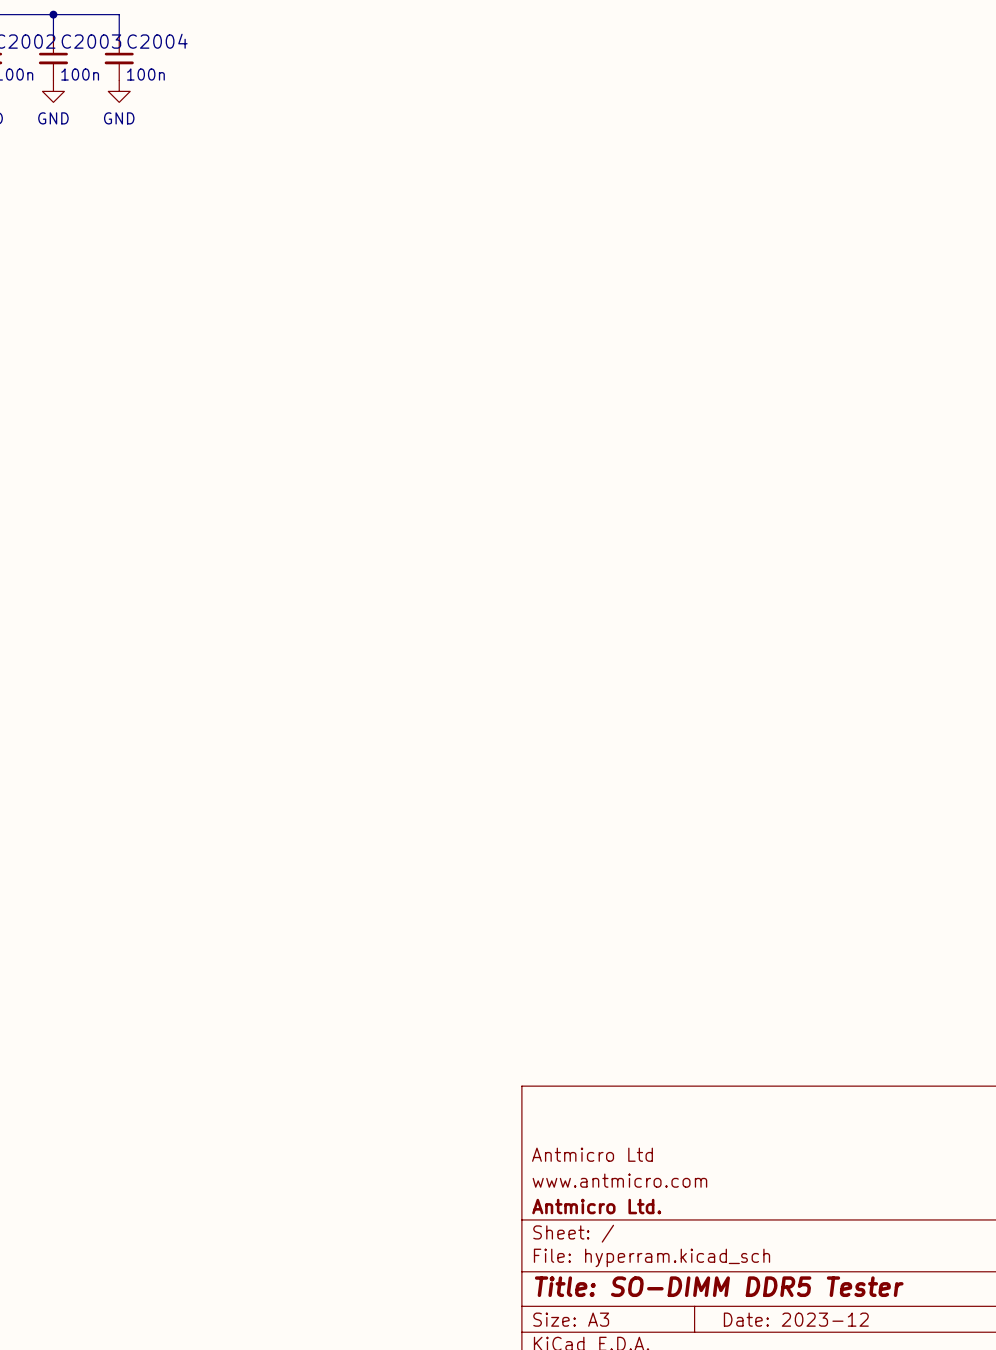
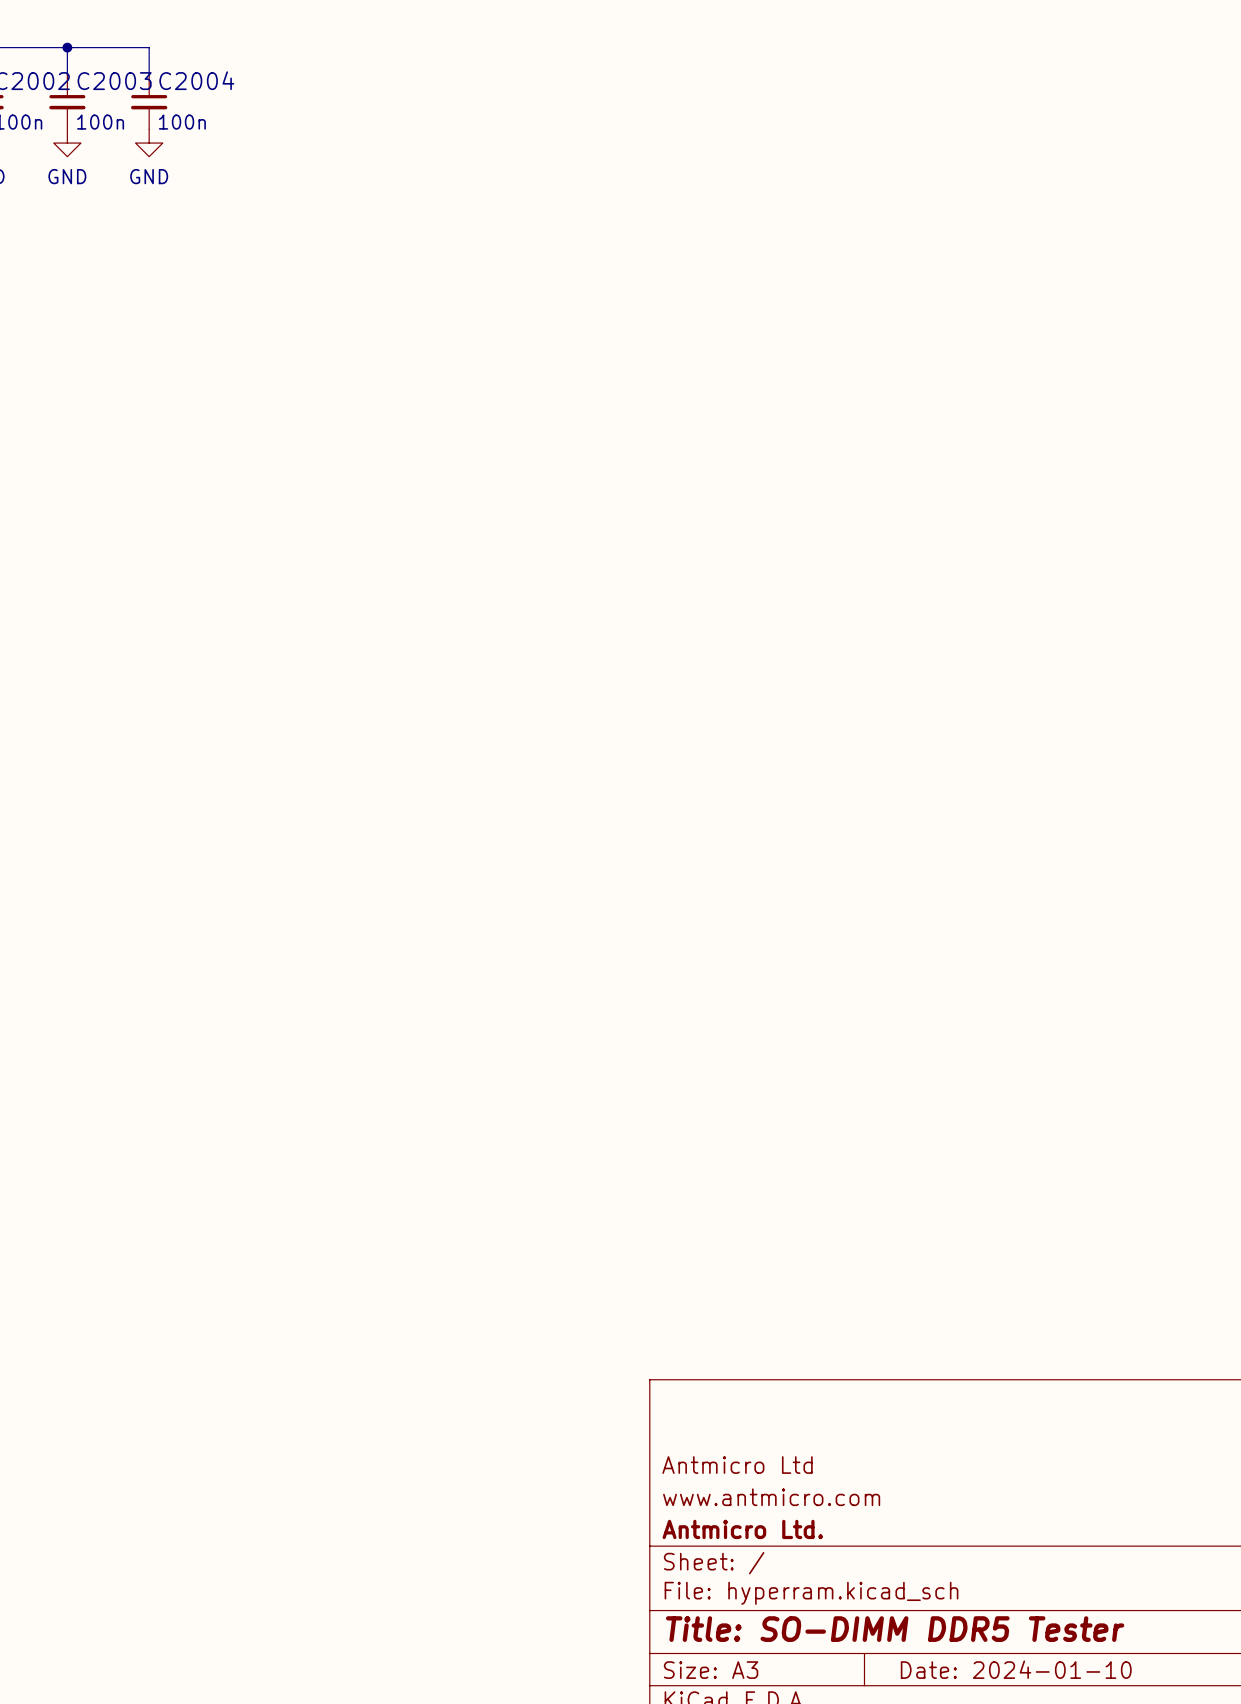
title block: Date: 2023-12 (796, 1319) -> Date: 2024-01-10 (1016, 1669)

